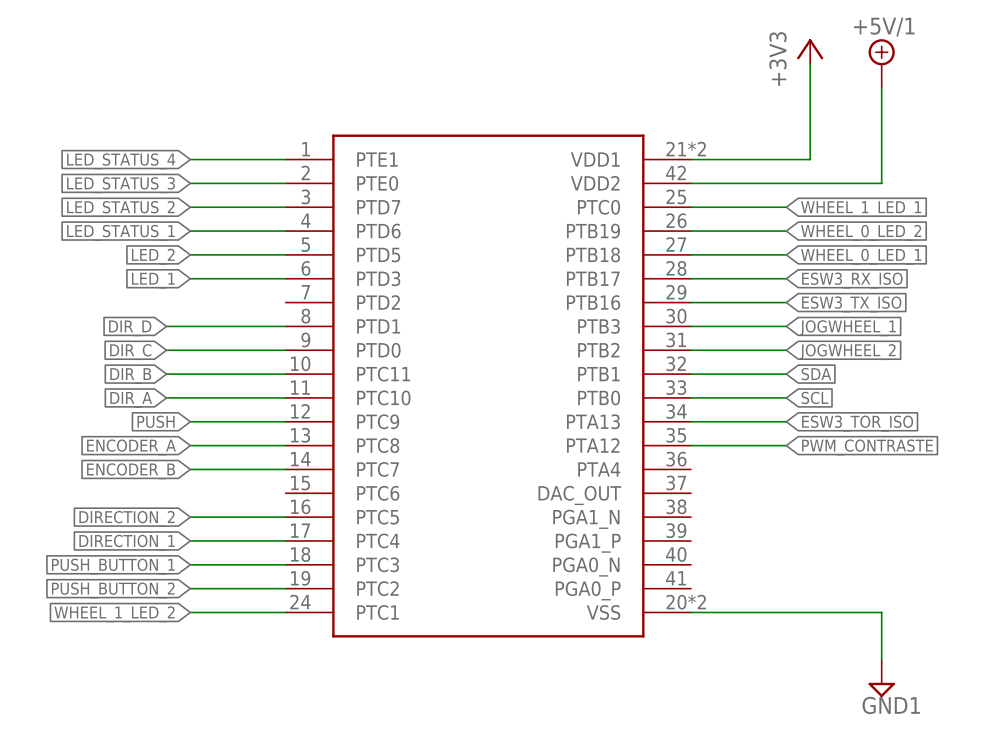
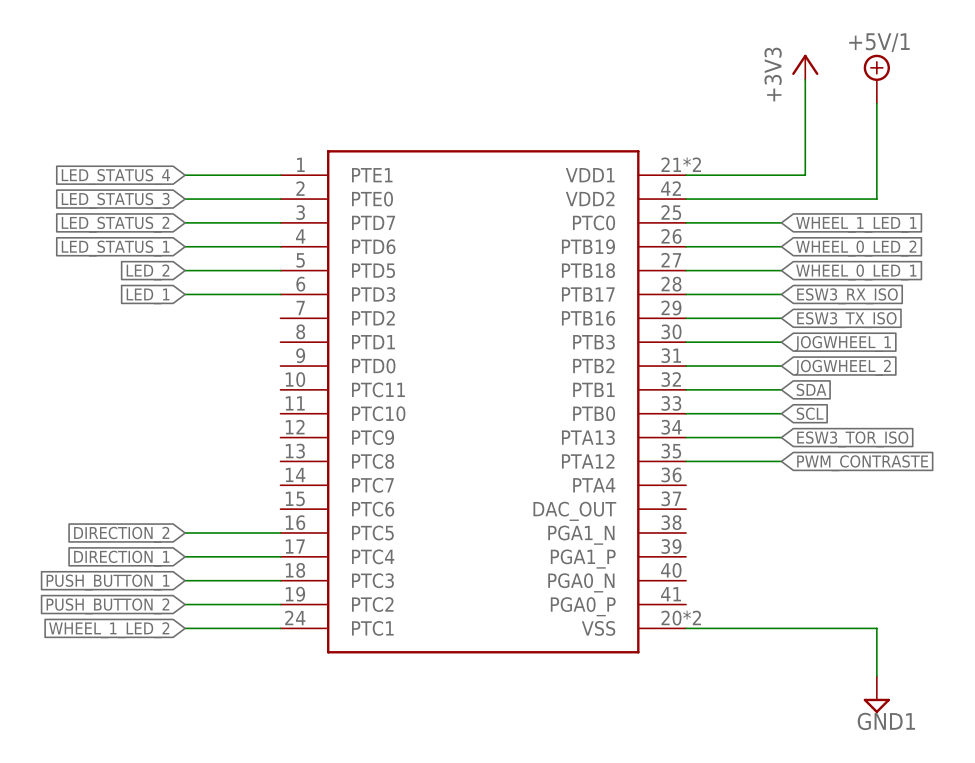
wire: (166, 326) (285, 326) -> none
global label: DIR_D (130, 328) -> none
wire: (166, 350) (285, 350) -> none
global label: DIR_C (130, 352) -> none
wire: (166, 374) (285, 374) -> none
global label: DIR_B (130, 376) -> none
wire: (166, 397) (285, 397) -> none
global label: DIR_A (131, 399) -> none
global label: PUSH (156, 421) -> none
wire: (190, 421) (285, 421) -> none
wire: (190, 445) (285, 445) -> none
global label: ENCODER_A (131, 447) -> none
wire: (190, 469) (285, 469) -> none
global label: ENCODER_B (131, 471) -> none

